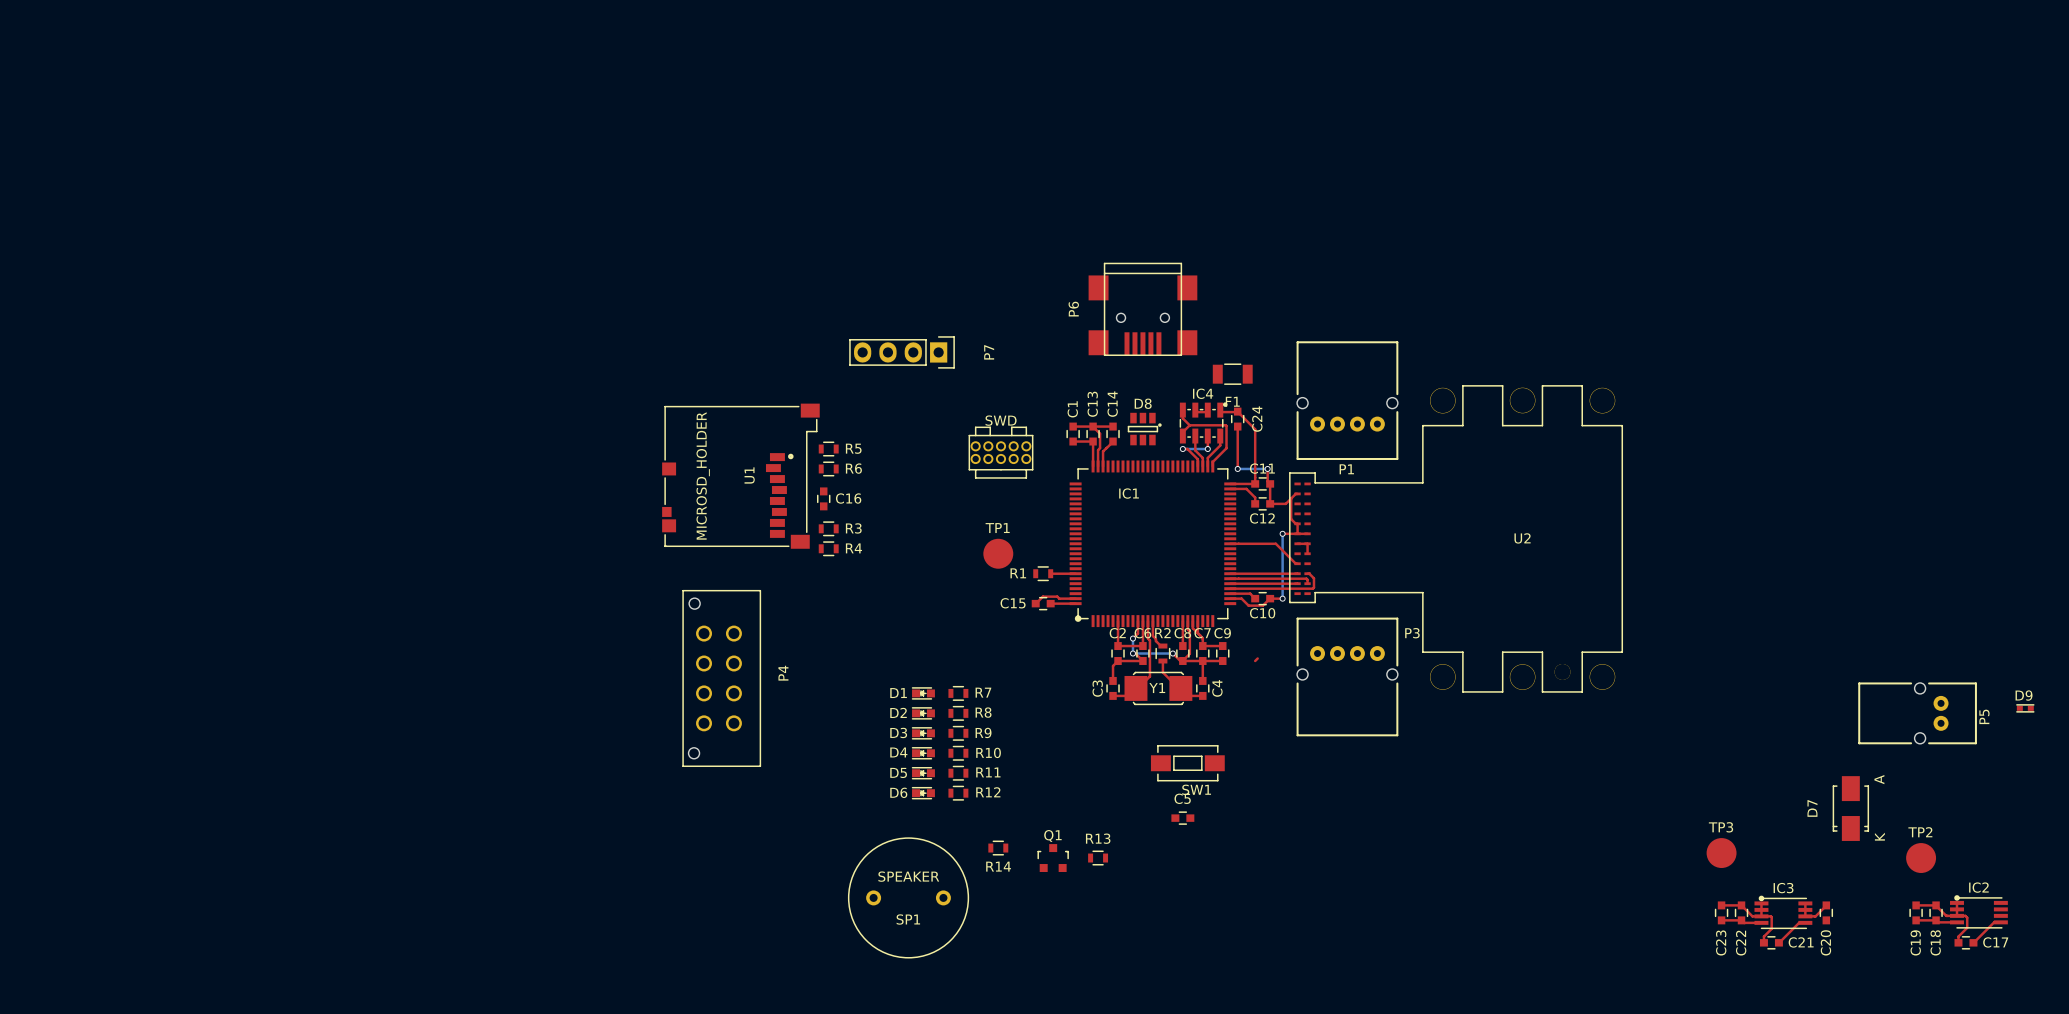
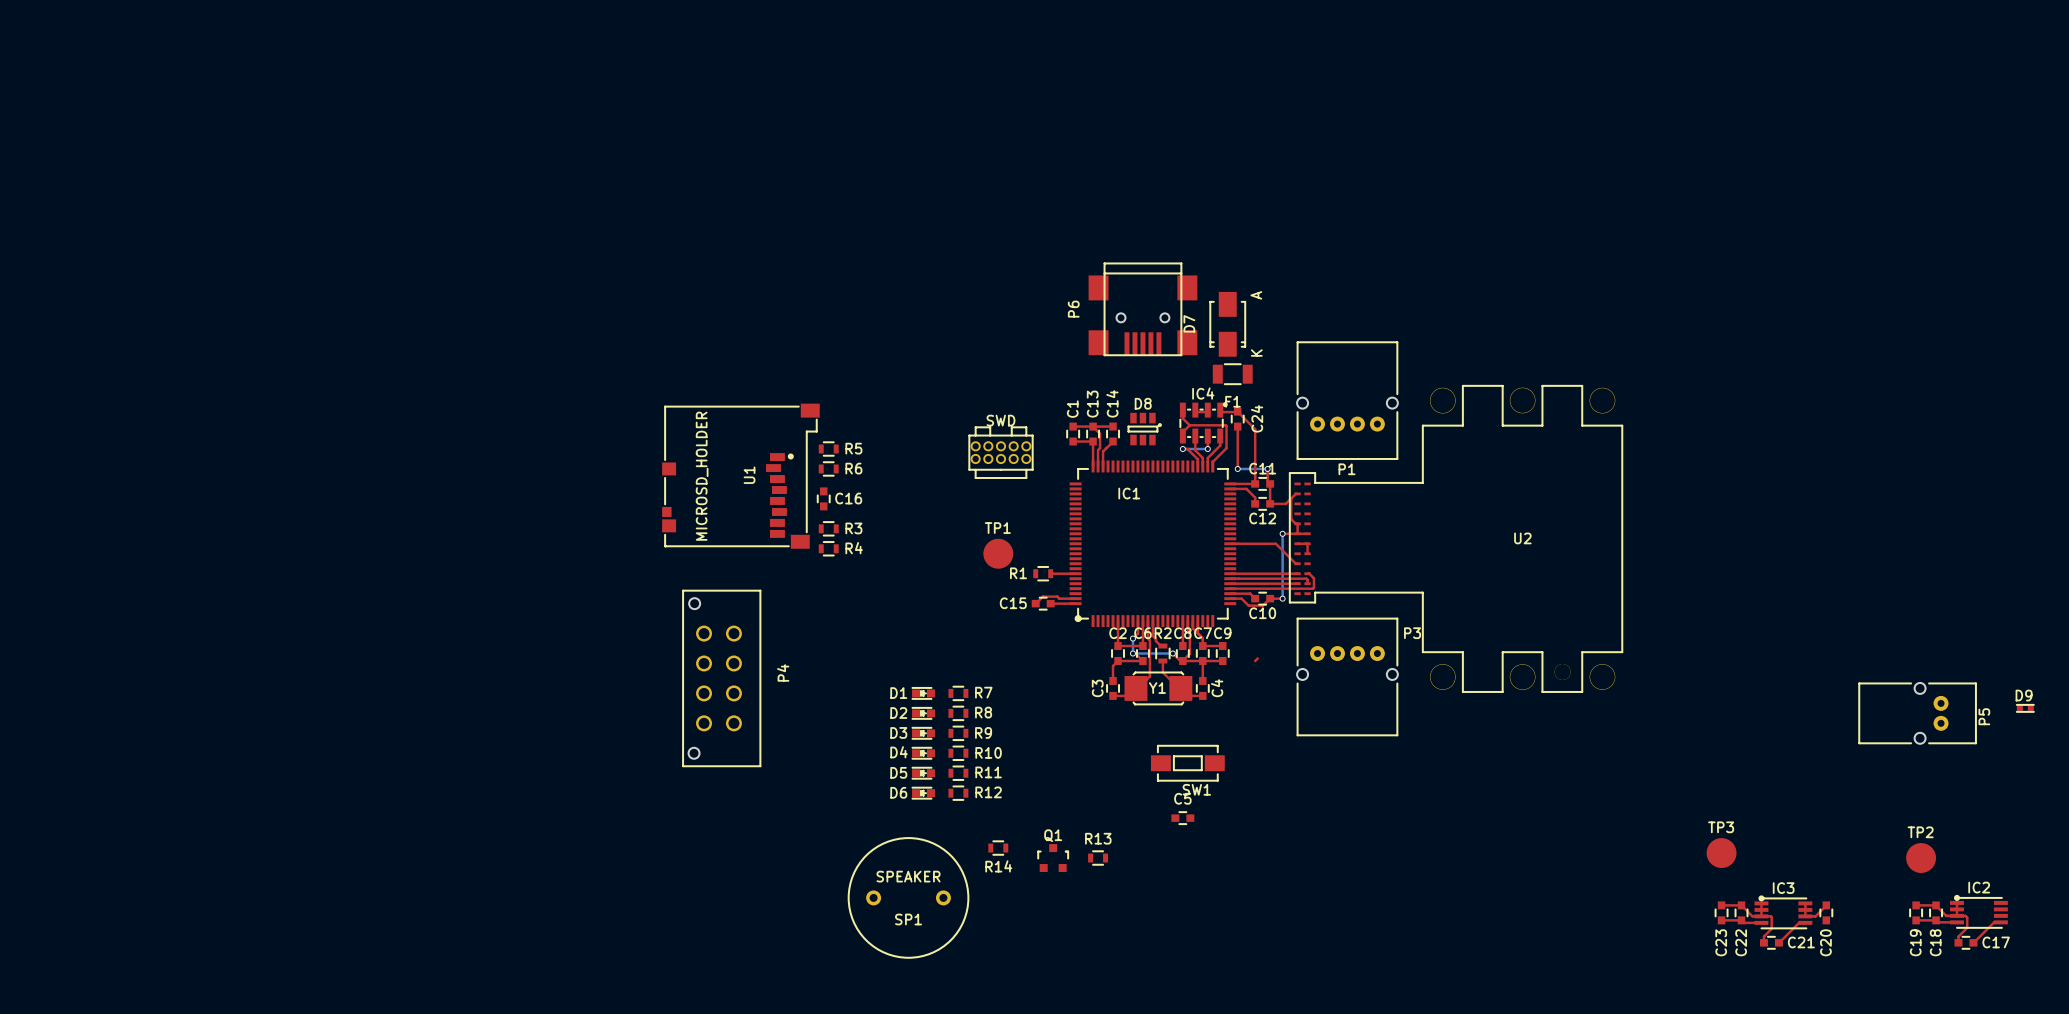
P7: (902, 352) -> none
D7 position: (1850, 808) -> (1227, 324)

